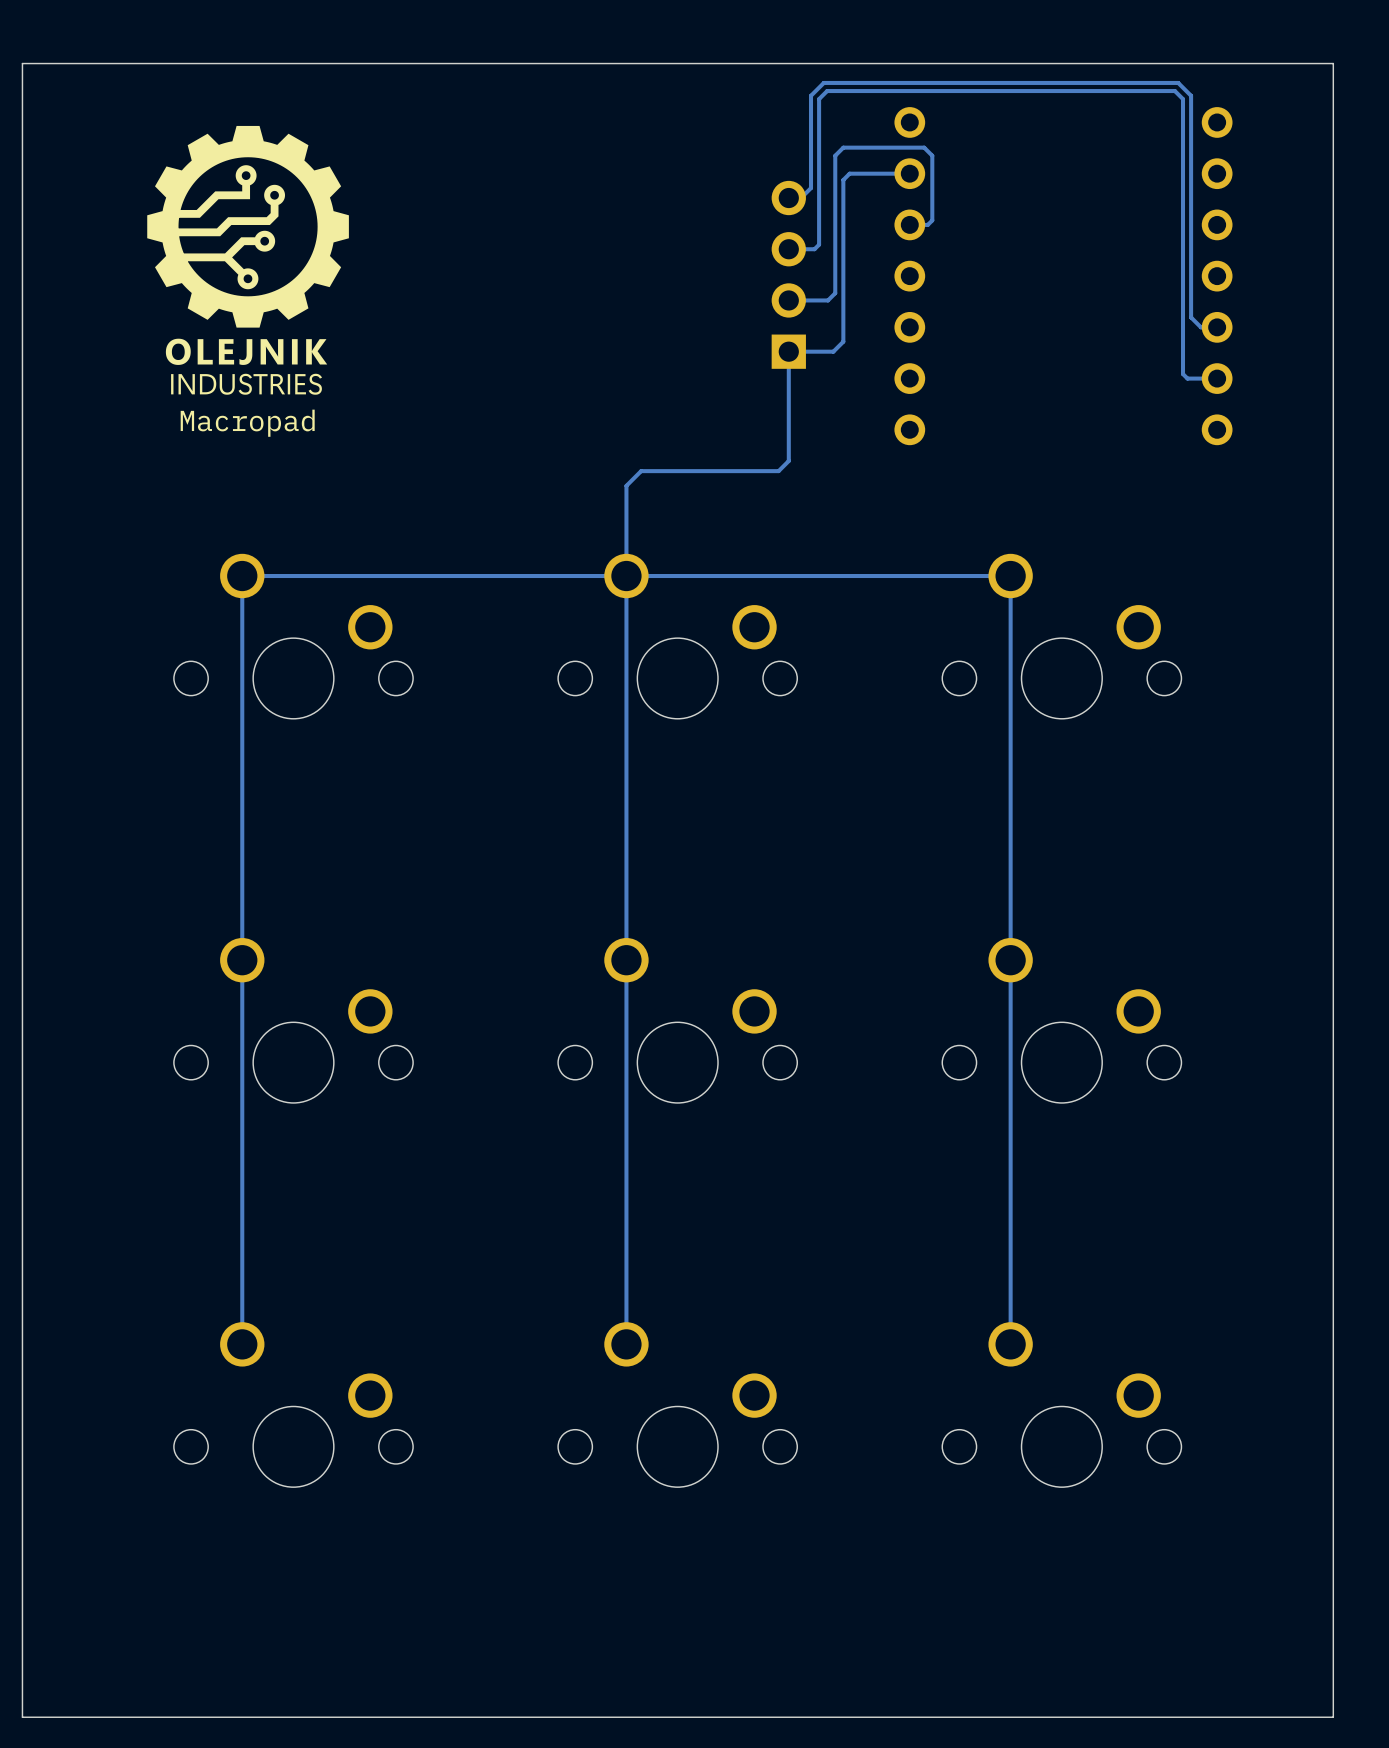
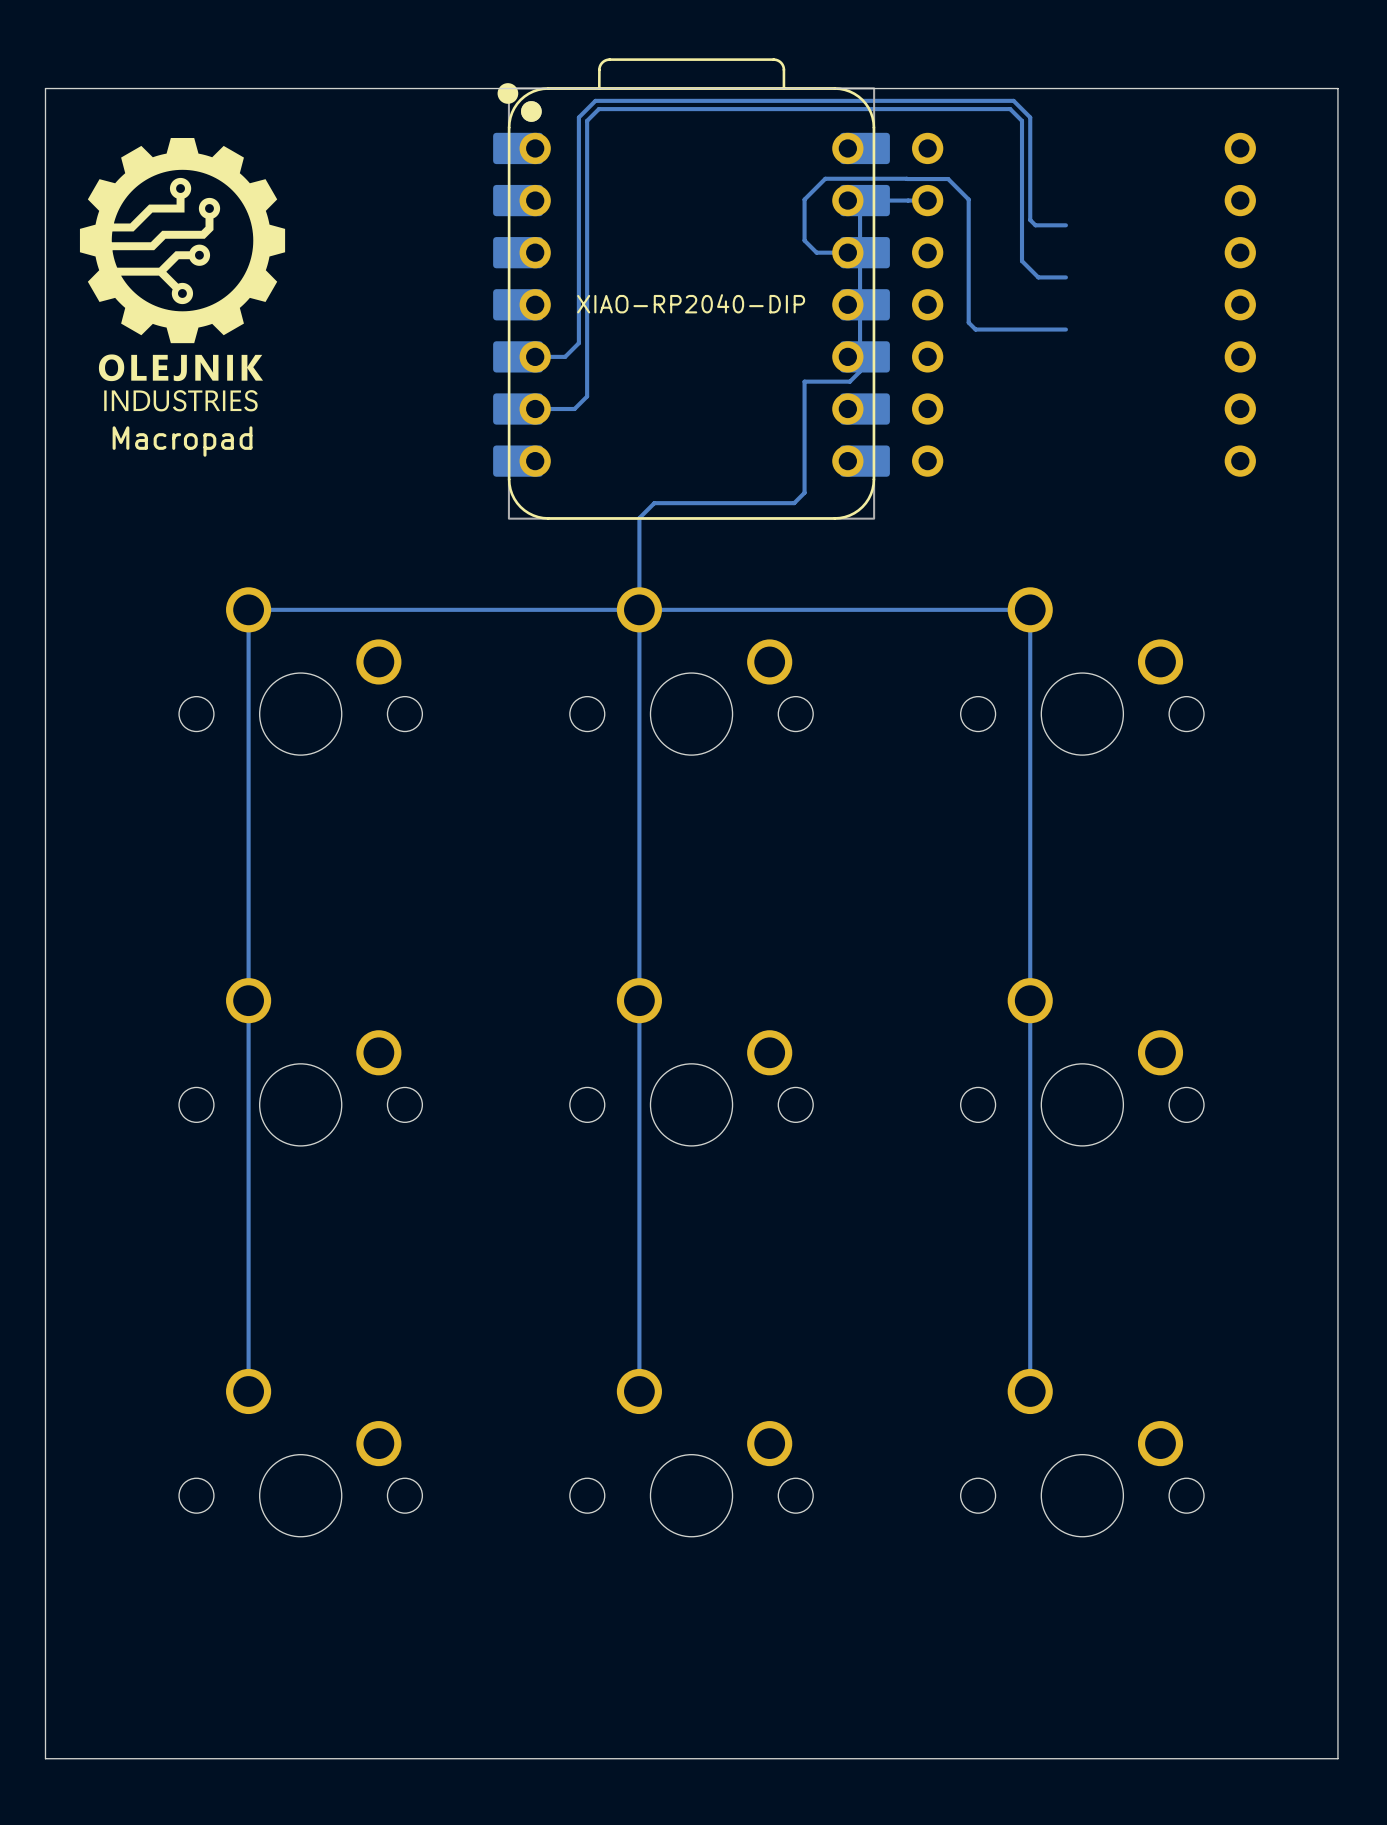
board edge: (1313, 63) (1333, 63) (1333, 1717) (22, 1717) (22, 63) (42, 63) -> (1337, 88) (1337, 1758) (45, 1758) (45, 88)
track: none -> (906, 178) (825, 178) (804, 199) (804, 240) (816, 252) (847, 252)
track: none -> (907, 179) (948, 179) (968, 199) (968, 322) (975, 329) (1065, 329)
drawing position: (217, 191) -> (151, 204)
track: (788, 198) (801, 198) (811, 188) (811, 95) (823, 82) (1178, 82) (1191, 95) (1191, 317) (1200, 327) (1217, 327) -> none
track: none -> (1065, 225) (1035, 225) (1030, 220) (1030, 117) (1013, 100) (595, 100) (578, 117) (578, 343) (565, 356) (535, 356)
drawing position: (231, 210) -> (165, 224)
track: (909, 224) (927, 224) (932, 220) (932, 155) (924, 147) (843, 147) (835, 155) (835, 293) (828, 300) (788, 300) -> none
drawing position: (248, 226) -> (182, 240)
track: (788, 249) (814, 249) (819, 244) (819, 99) (827, 91) (1174, 91) (1183, 99) (1183, 374) (1187, 378) (1217, 378) -> none
track: none -> (1065, 277) (1038, 277) (1022, 261) (1022, 120) (1010, 109) (598, 109) (587, 120) (587, 396) (574, 409) (535, 409)
drawing position: (229, 260) -> (163, 274)
part: none -> XIAO-RP2040-DIP (691, 289)
part: (788, 274) -> none
drawing position: (178, 351) -> (111, 367)
drawing position: (205, 351) -> (138, 367)
drawing position: (226, 351) -> (160, 367)
drawing position: (272, 351) -> (206, 367)
drawing position: (294, 351) -> (230, 367)
drawing position: (316, 351) -> (252, 367)
drawing position: (245, 352) -> (180, 367)
drawing: none -> [104, 390, 107, 412]
drawing: none -> [222, 390, 226, 412]
drawing: [287, 373, 323, 395] -> none
drawing shape: [171, 374, 174, 395] -> [172, 390, 187, 412]
drawing position: (186, 384) -> (120, 400)
drawing position: (208, 384) -> (141, 400)
drawing position: (227, 384) -> (161, 400)
drawing position: (245, 384) -> (250, 400)
drawing position: (260, 384) -> (195, 400)
drawing position: (277, 384) -> (212, 400)
drawing position: (300, 384) -> (235, 400)
text position: Macropad (247, 423) -> Macropad (182, 441)

